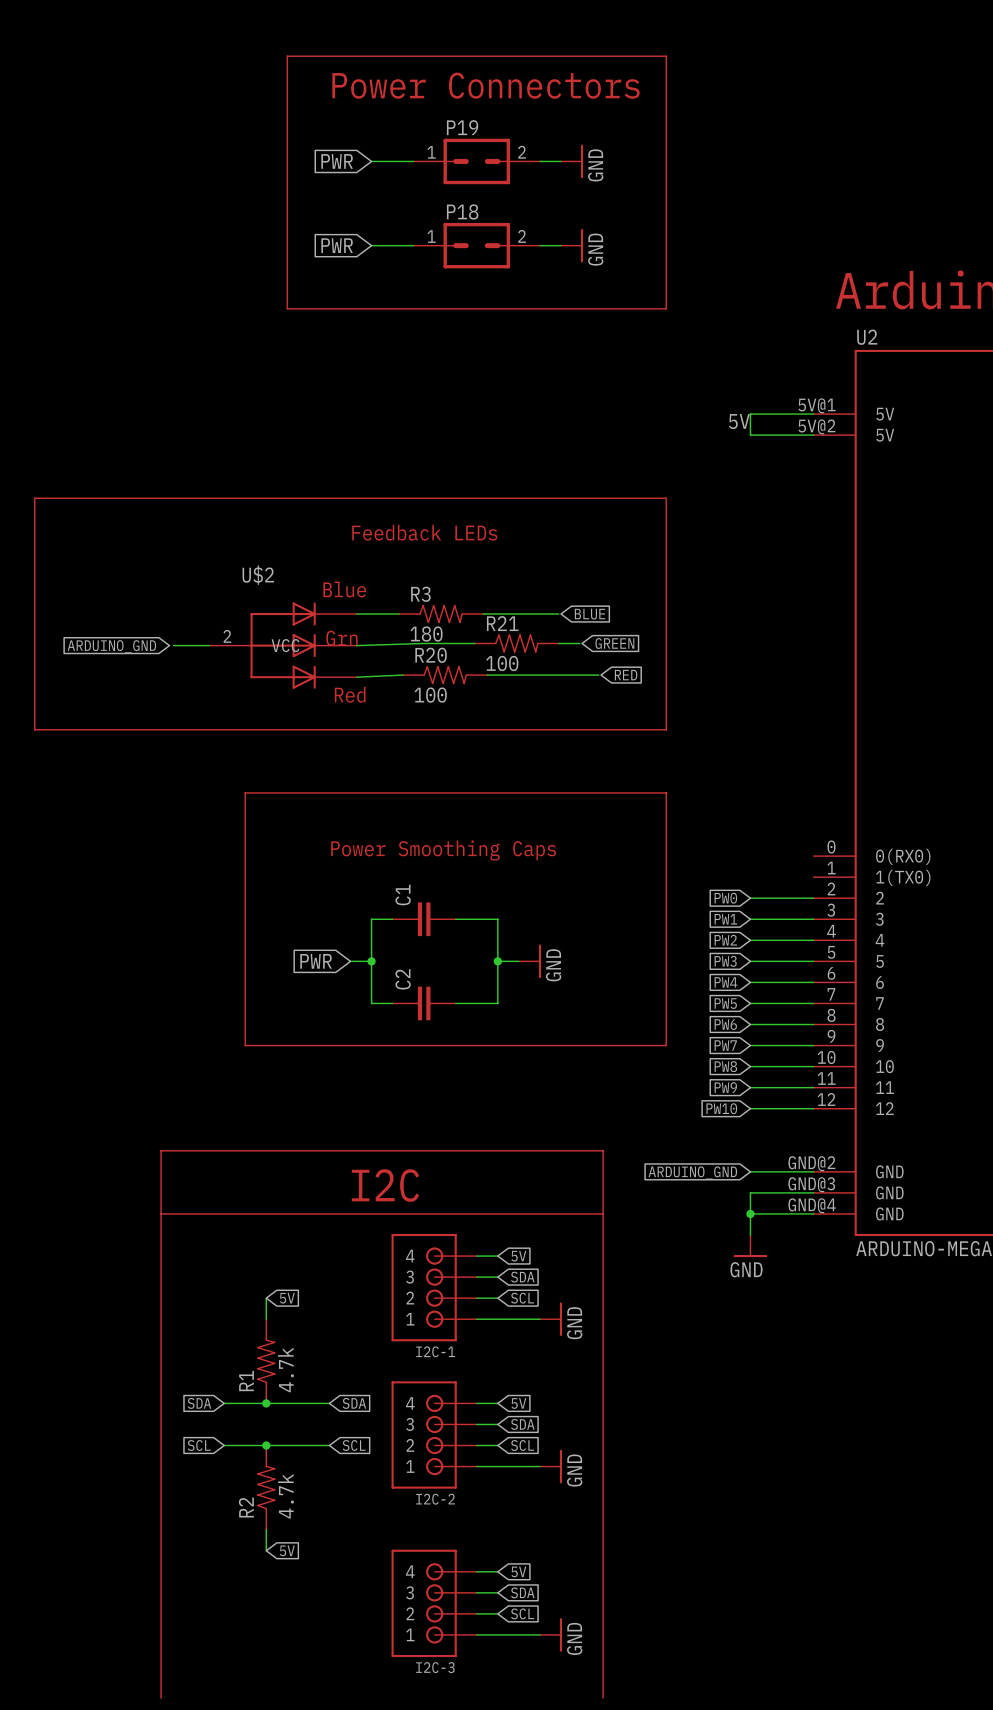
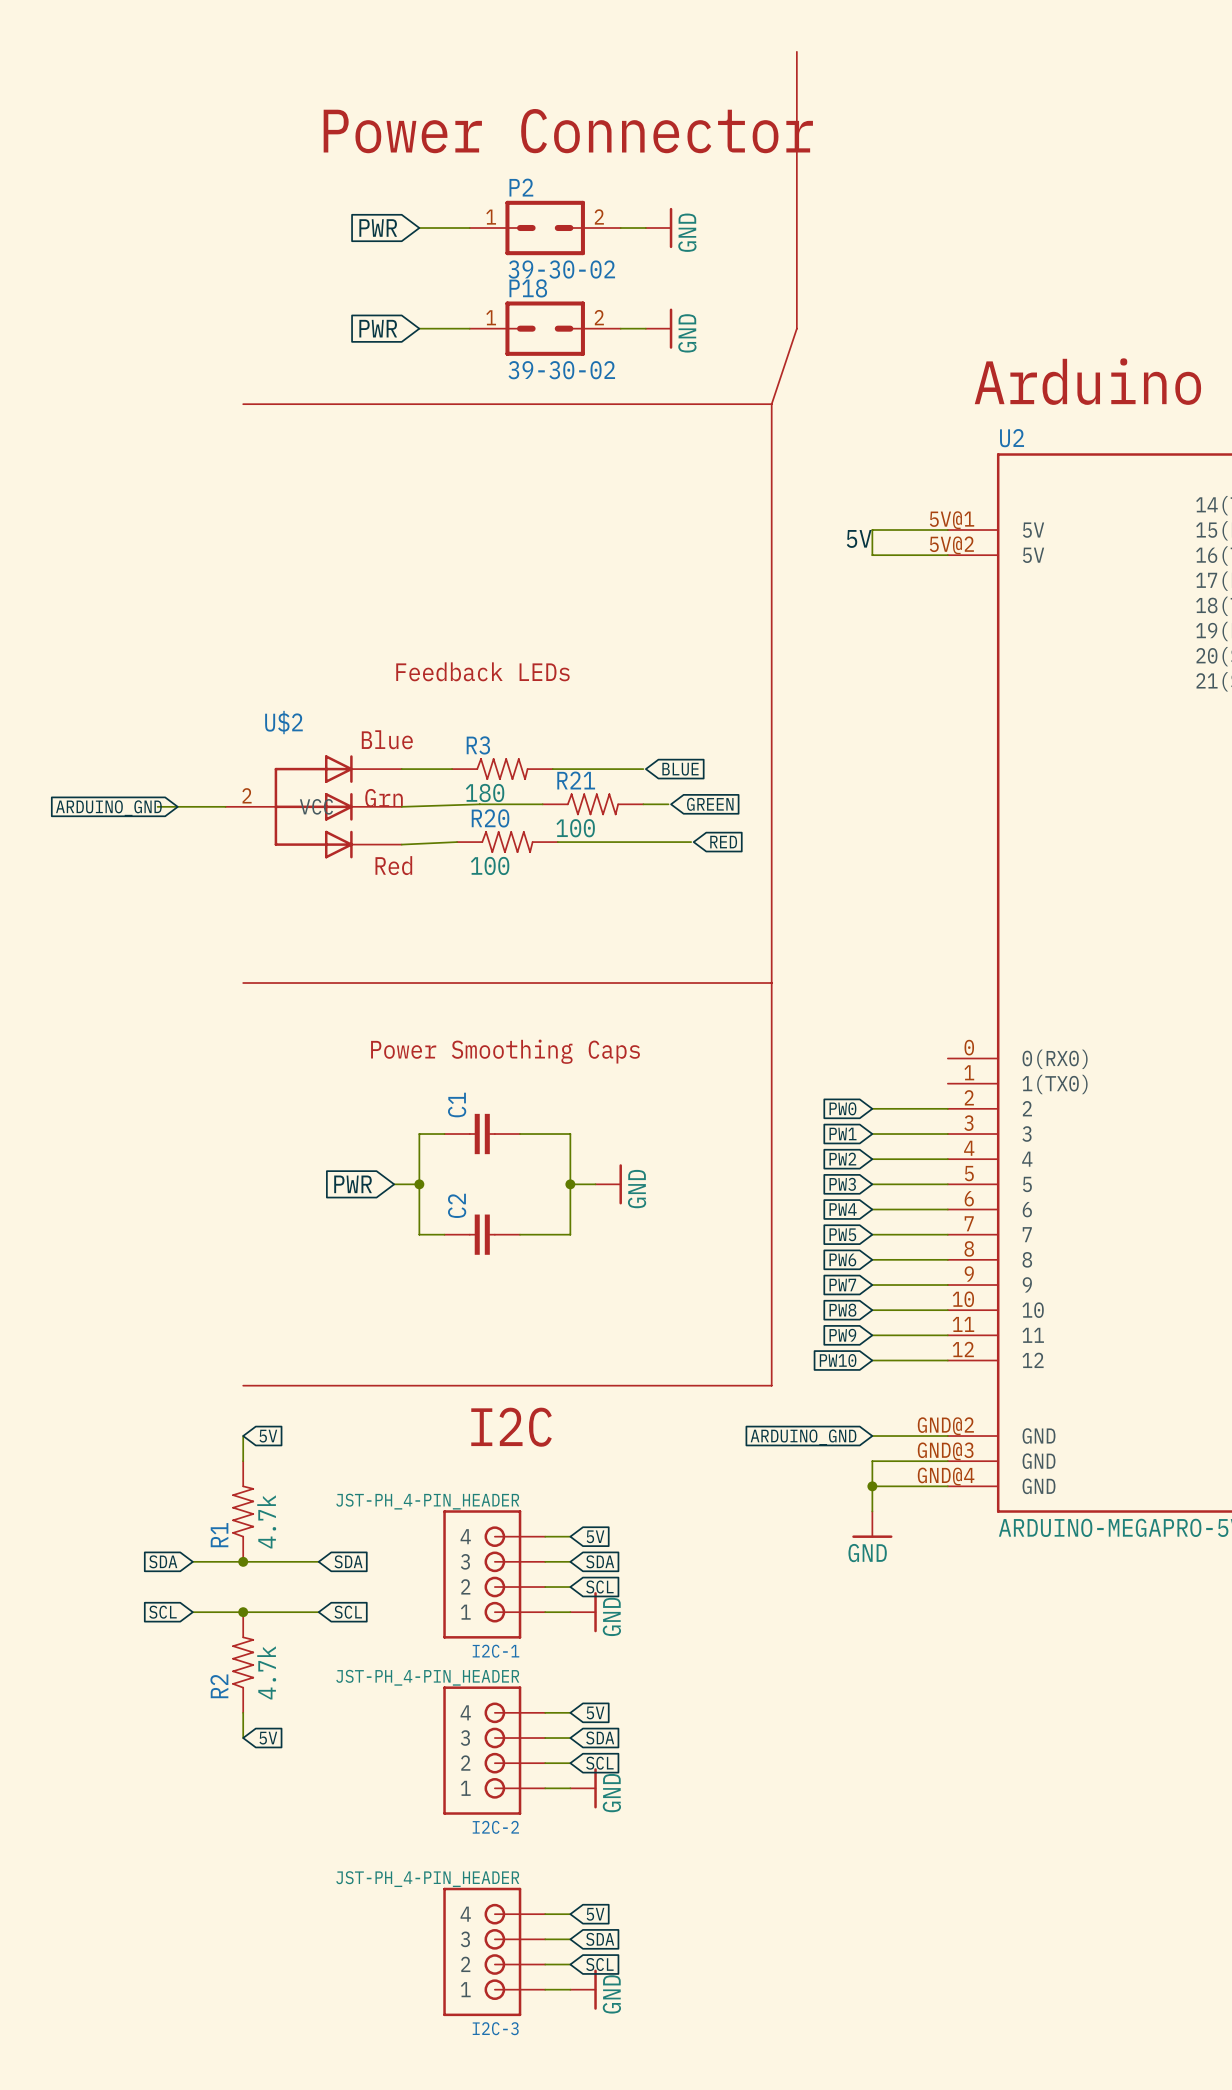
line: none -> (796, 51) (796, 328) (771, 404) (771, 630)
text: Power Connectors (486, 85) -> Power Connector (568, 131)
P19 name: P19 (462, 127) -> P2 (521, 187)
P19 value: none -> 39-30-02 (561, 269)
P18 value: none -> 39-30-02 (561, 370)
line: (287, 308) (287, 56) (666, 56) (666, 308) -> (318, 404) (243, 404)
line: (666, 498) (34, 498) (34, 729) (666, 729) -> (771, 983) (771, 907)
wire: none -> (157, 806) (182, 806)
line: none -> (243, 983) (268, 983)
line: (245, 792) (245, 1045) (666, 1045) -> (243, 1385) (771, 1385) (771, 1285)
global label: none -> 5V (268, 1436)
text position: I2C (385, 1185) -> I2C (511, 1427)
line: (161, 1213) (603, 1213) -> none
I2C-1 value: none -> JST-PH_4-PIN_HEADER (427, 1501)
global label: none -> SDA (163, 1561)
wire: none -> (192, 1561) (318, 1561)
junction: none -> (243, 1561)
global label: none -> SDA (348, 1561)
wire: (266, 1298) (266, 1319) -> (243, 1436) (243, 1461)
global label: 5V (287, 1298) -> none
global label: none -> SCL (162, 1612)
junction: none -> (243, 1612)
global label: none -> SCL (348, 1612)
power symbol position: GND (551, 1319) -> GND (583, 1612)
R1 position: (266, 1361) -> (243, 1511)
I2C-2 value: none -> JST-PH_4-PIN_HEADER (427, 1677)
global label: SDA (199, 1403) -> none
wire: (224, 1403) (329, 1403) -> (243, 1712) (243, 1738)
junction: (266, 1403) -> none
global label: SDA (354, 1403) -> none
global label: none -> 5V (268, 1738)
global label: SCL (199, 1445) -> none
wire: (224, 1445) (329, 1445) -> (192, 1612) (318, 1612)
junction: (266, 1445) -> none
global label: SCL (354, 1445) -> none
power symbol position: GND (551, 1466) -> GND (583, 1788)
R2 position: (266, 1487) -> (243, 1662)
wire: (266, 1529) (266, 1550) -> none
I2C-3 value: none -> JST-PH_4-PIN_HEADER (427, 1879)
global label: 5V (287, 1550) -> none
power symbol position: GND (551, 1634) -> GND (583, 1989)
line: (161, 1698) (161, 1150) (603, 1150) (603, 1698) -> none

